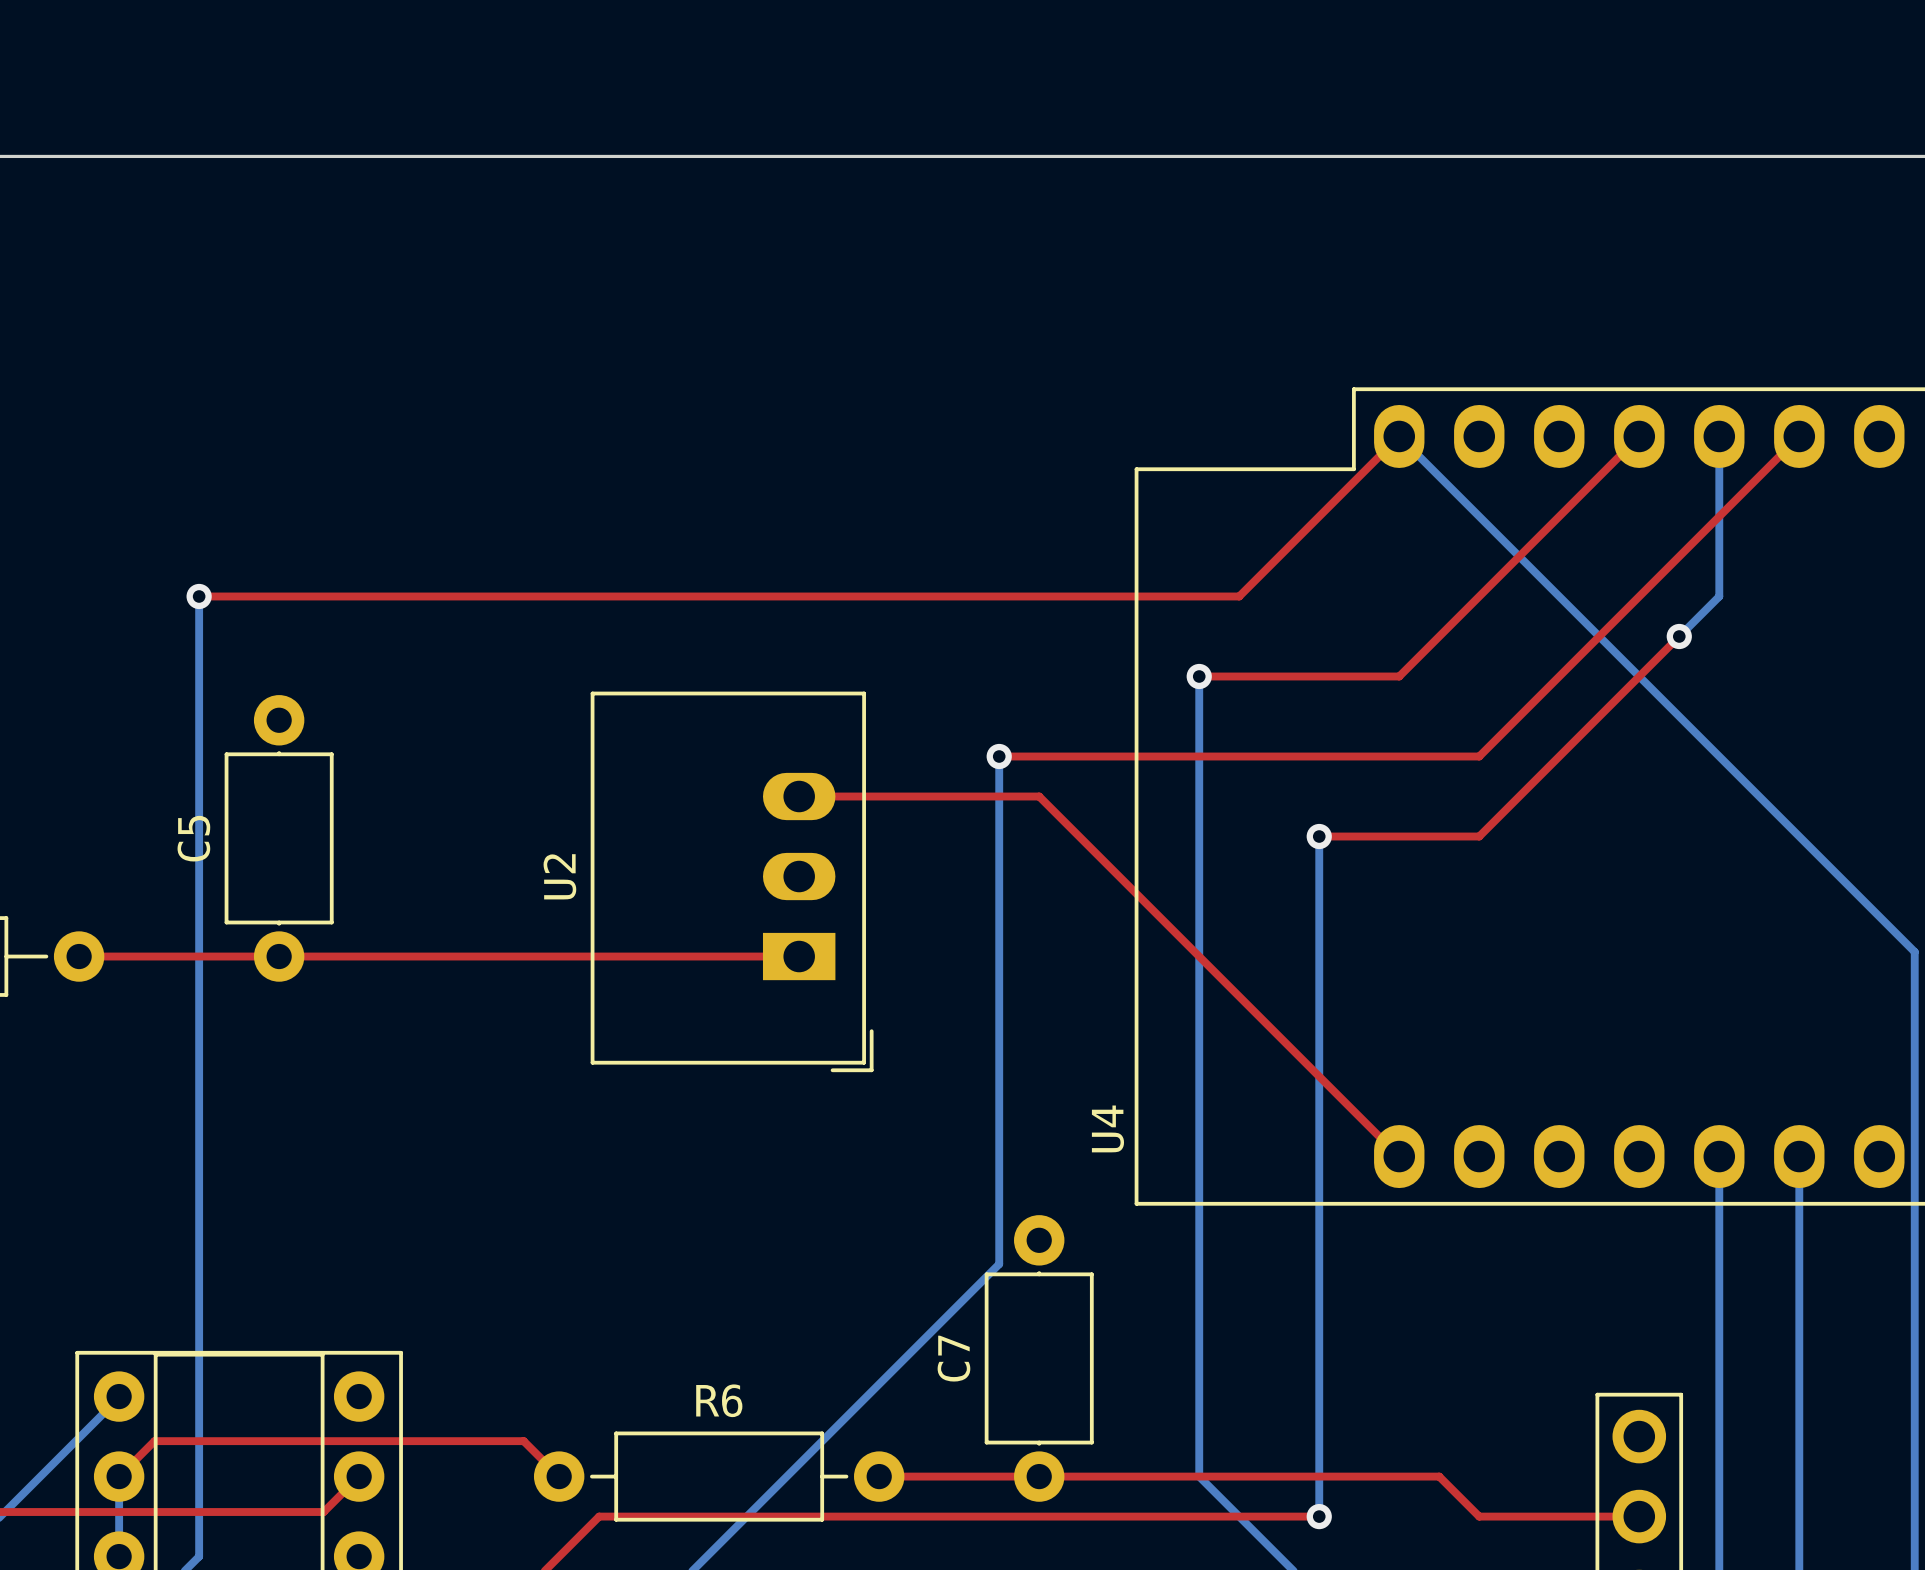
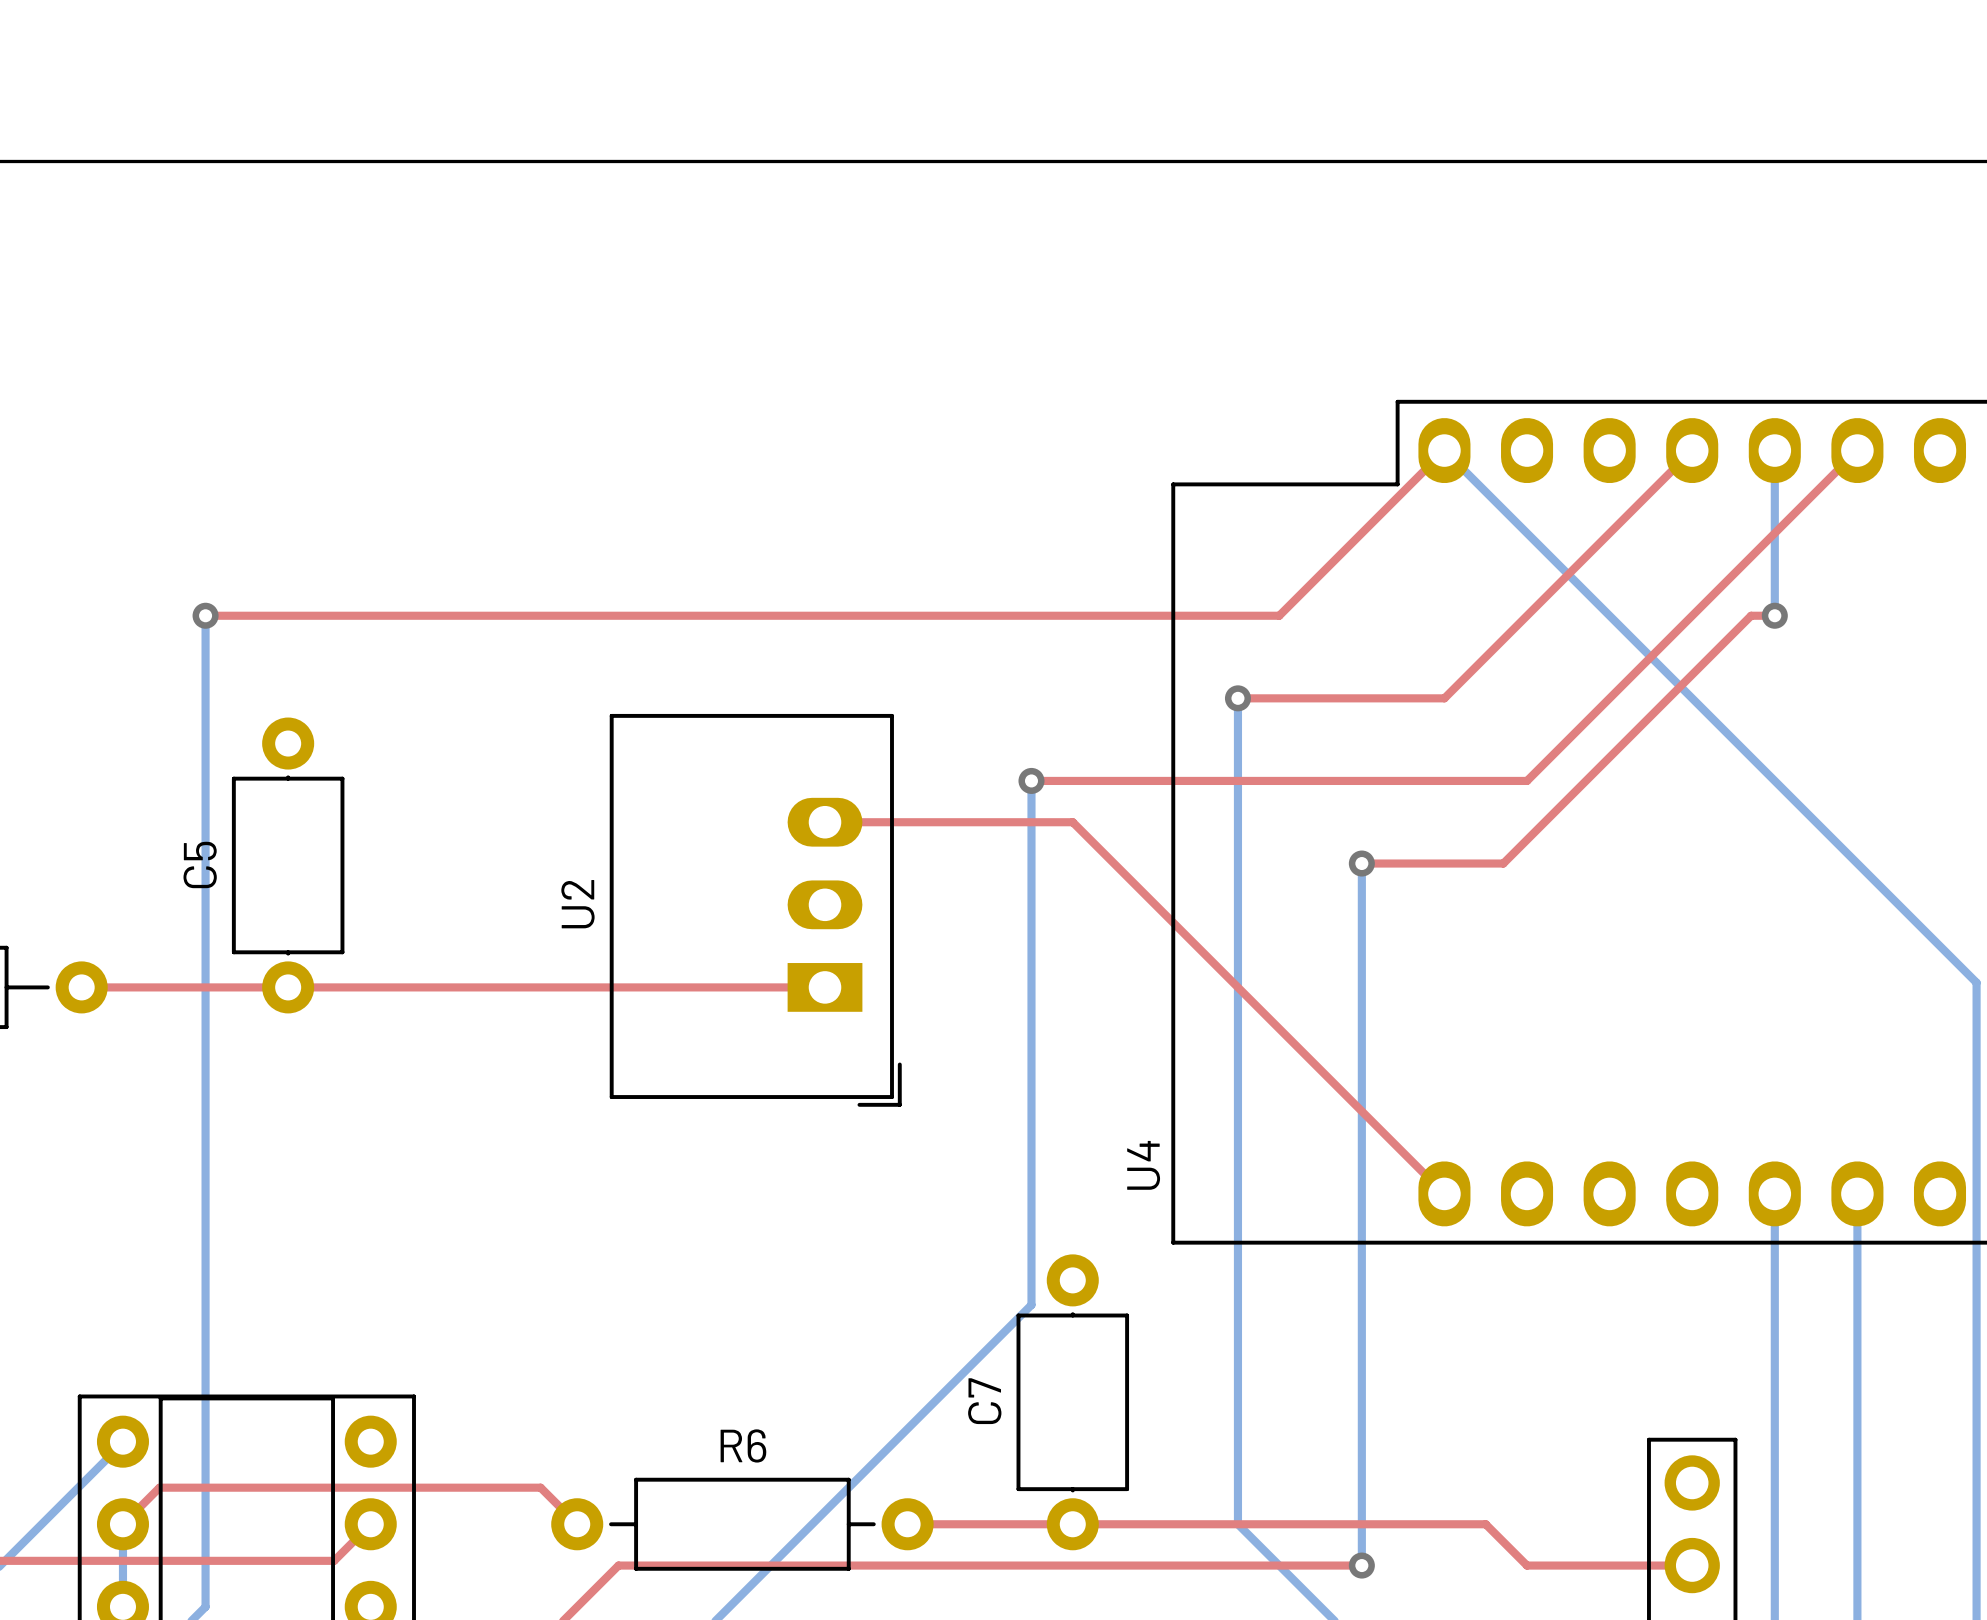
bottom track: (1719, 596) (1679, 636) -> none
top track: (1679, 636) (1479, 836) (1456, 836) -> (1774, 615) (1751, 615) (1503, 863)
via position: (1679, 636) -> (1774, 615)

